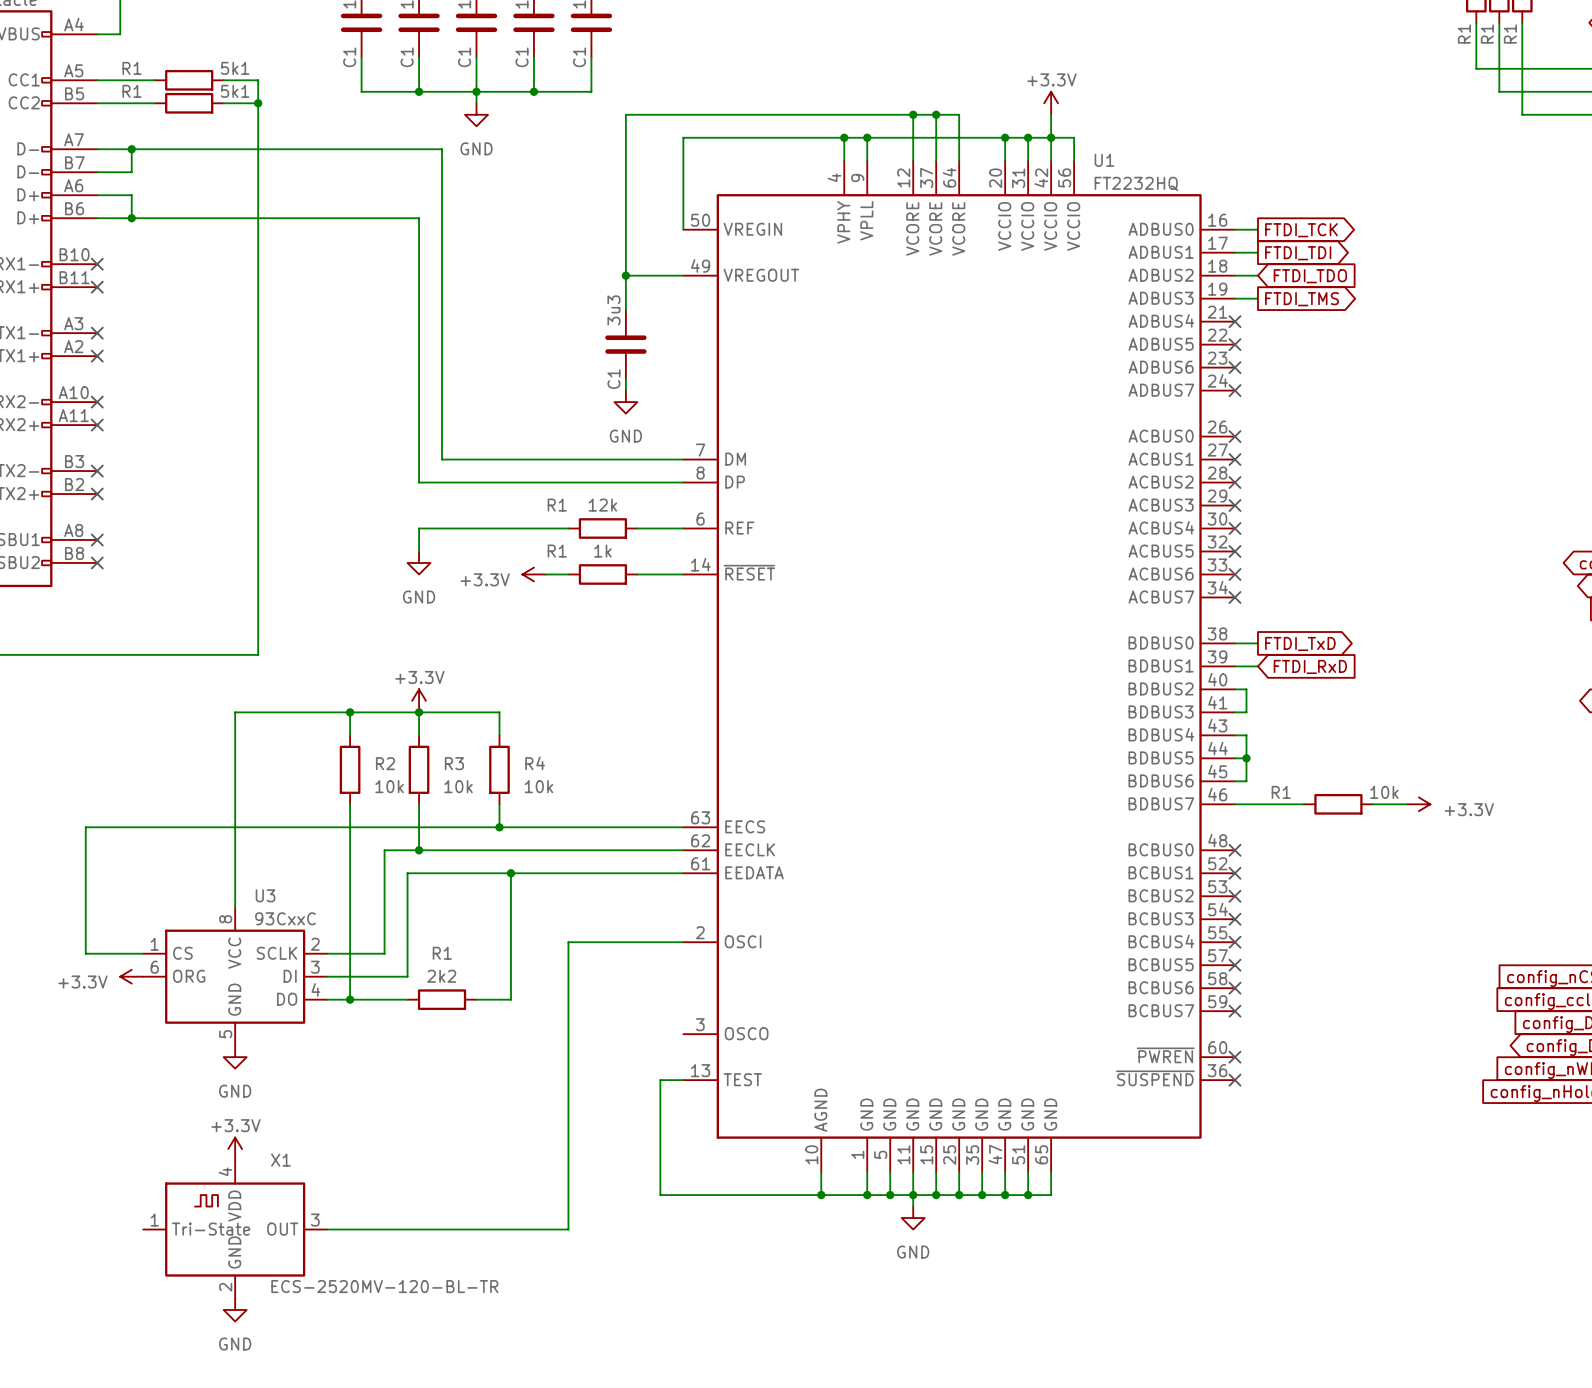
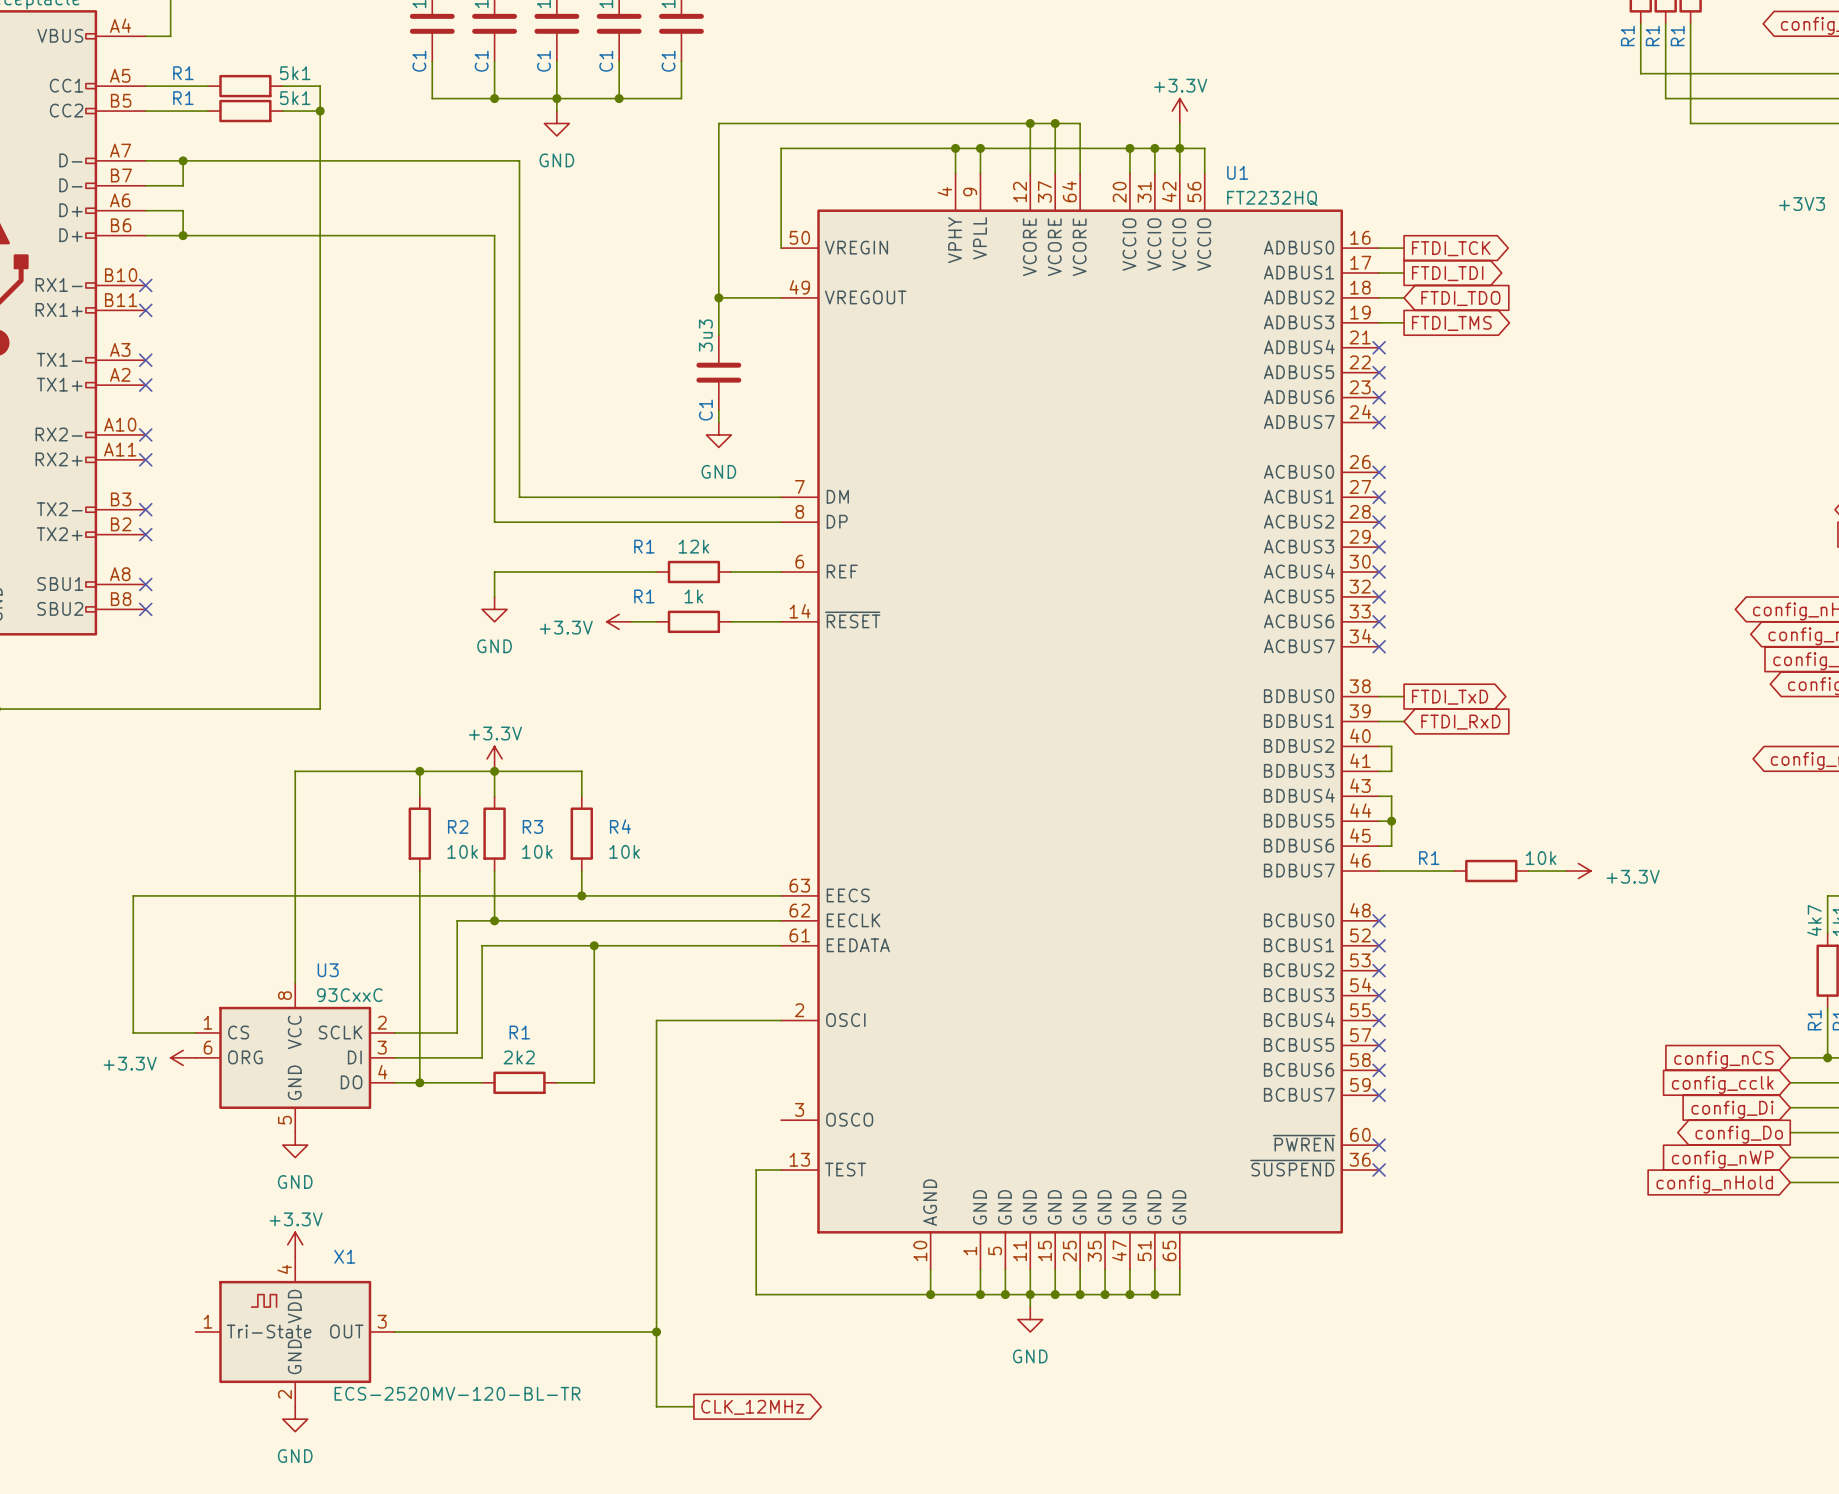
wire: none -> (656, 1331) (656, 1406) (693, 1406)
junction: none -> (656, 1331)
global label: none -> CLK_12MHz (752, 1407)

